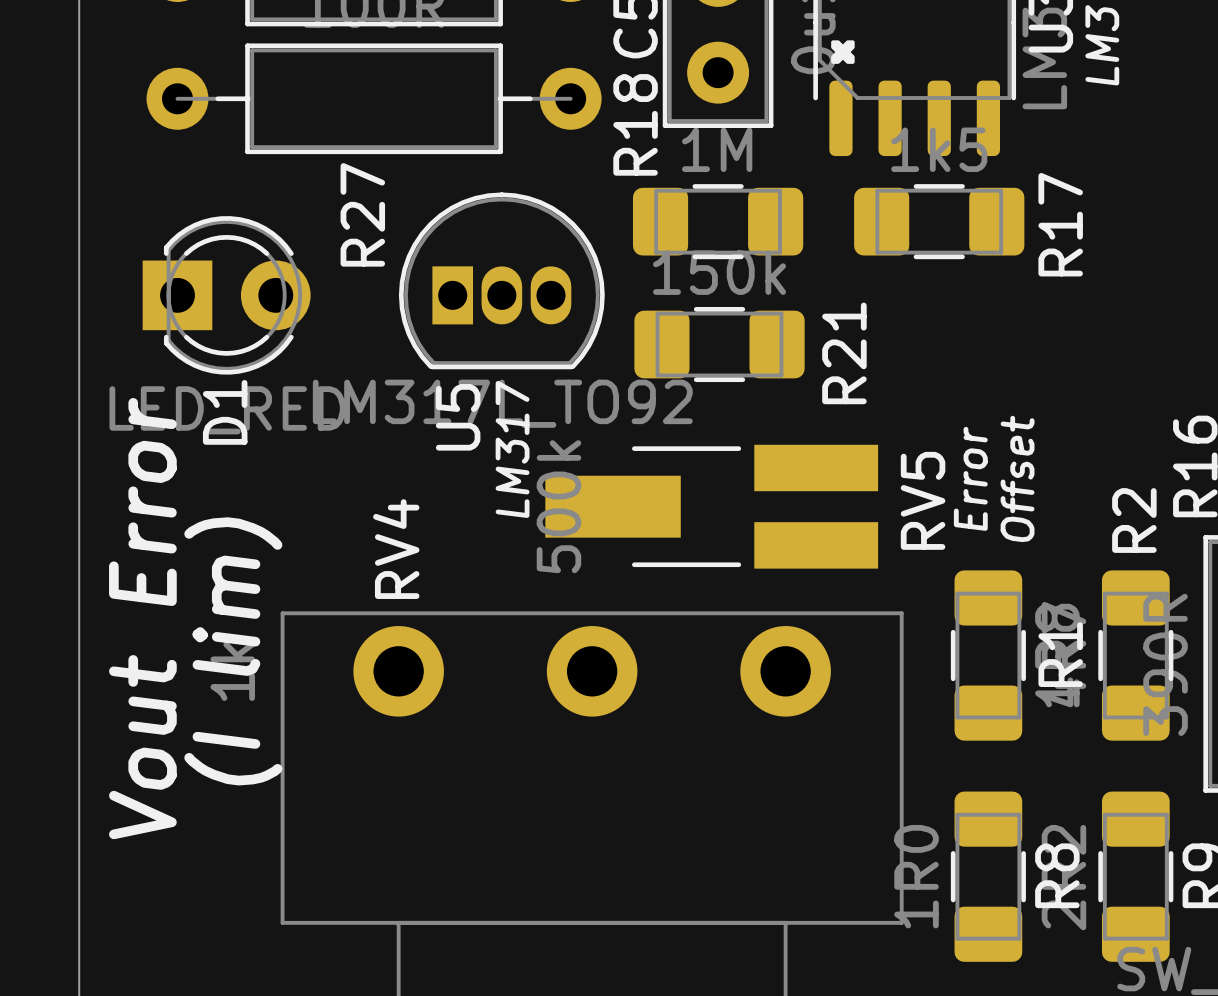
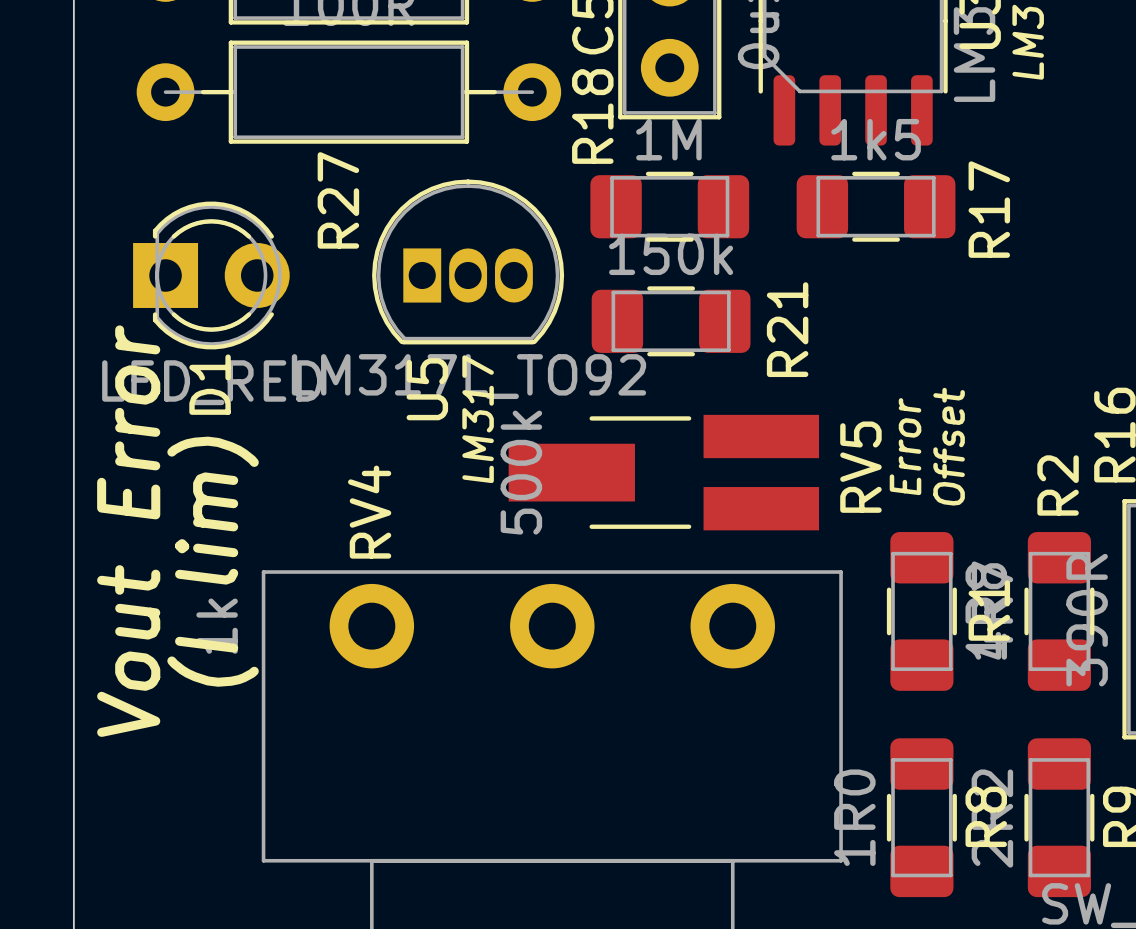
drawing: [831, 40, 855, 64] -> none
text position: Vout Error (142, 618) -> Vout Error (128, 531)
text position: (I lim) (233, 651) -> (I lim) (213, 561)

